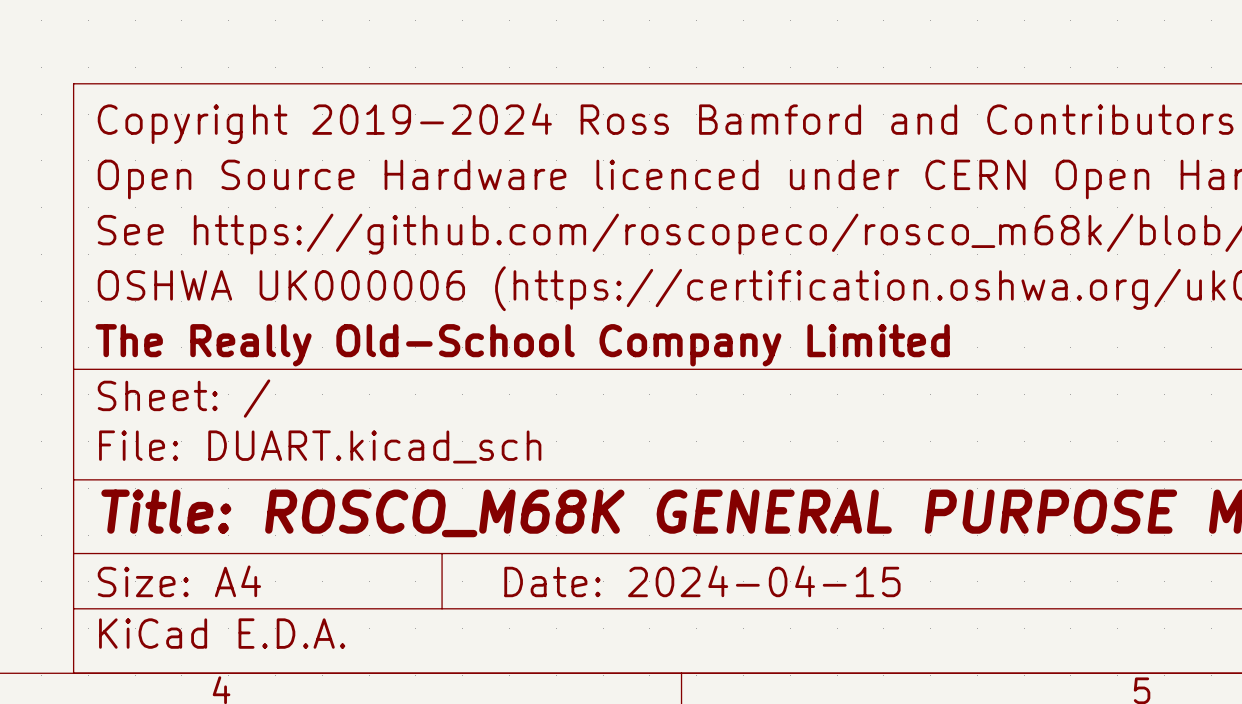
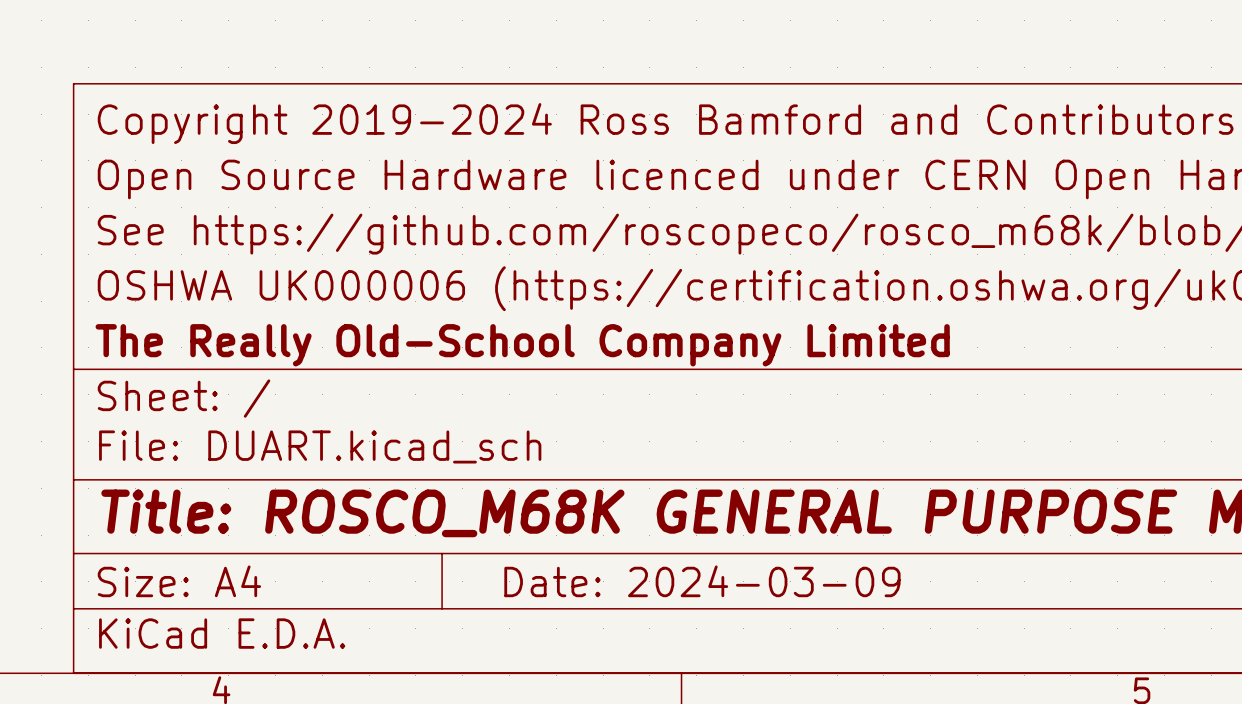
title block: Date: 2024-04-15 (702, 581) -> Date: 2024-03-09 (702, 581)

